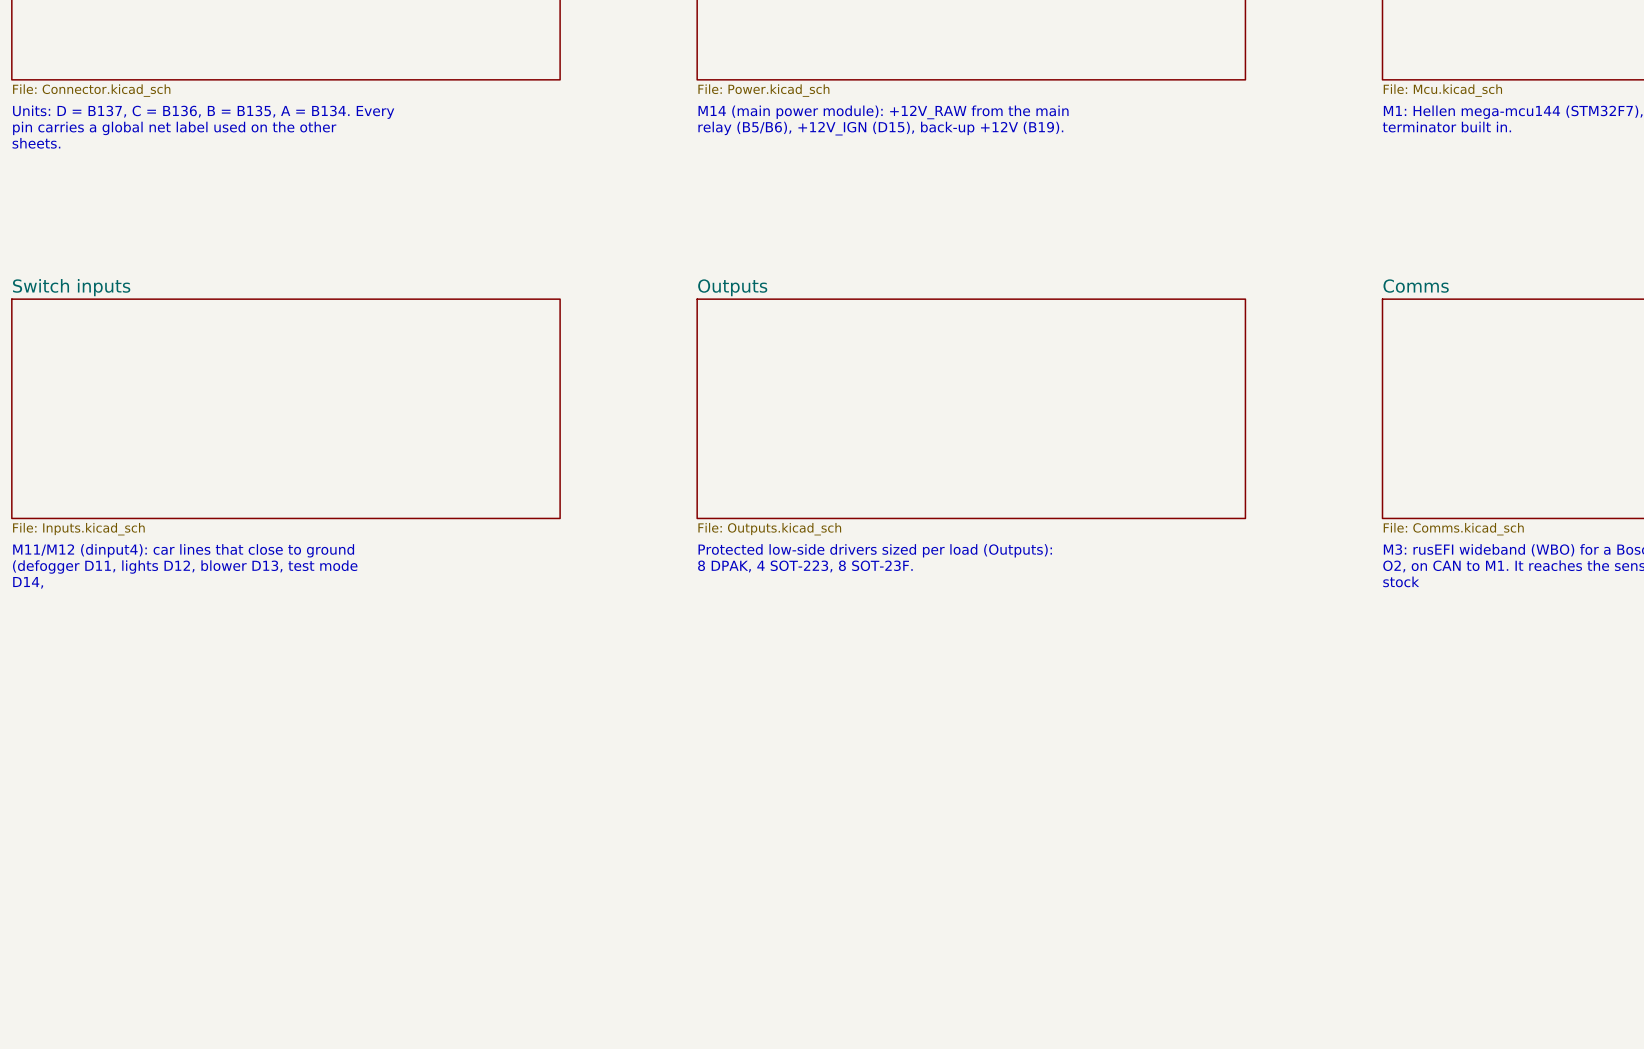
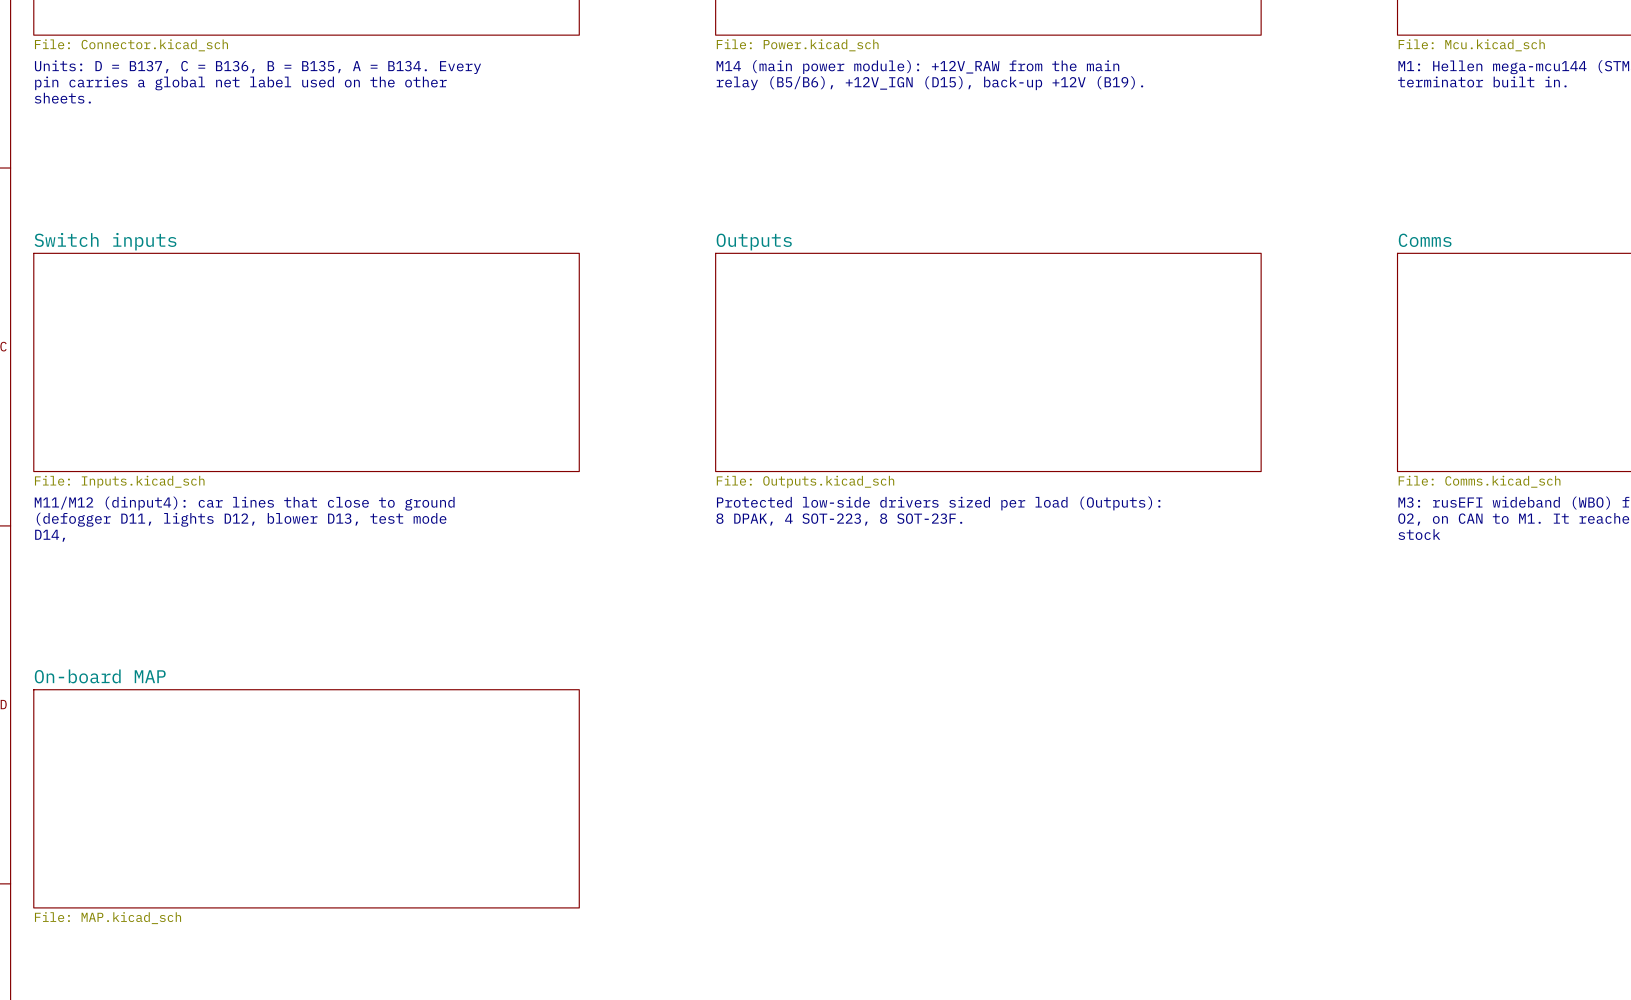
sheet On-board MAP: none -> File: MAP.kicad_sch (306, 798)

